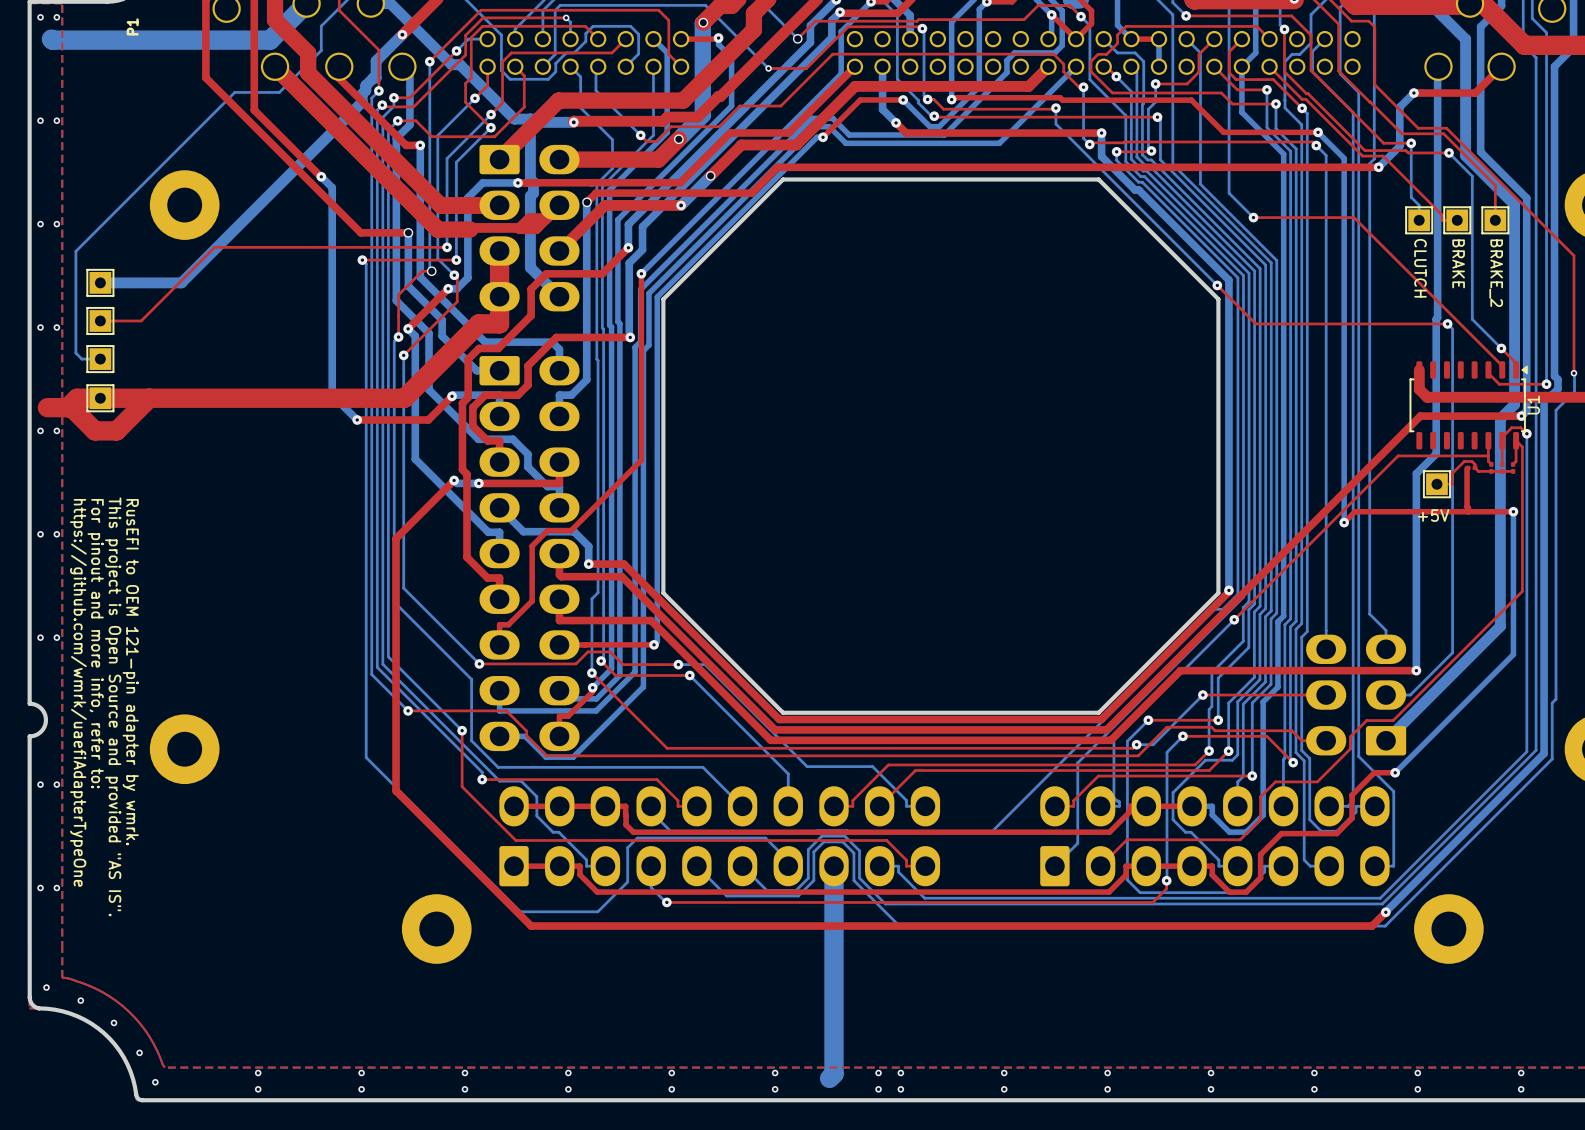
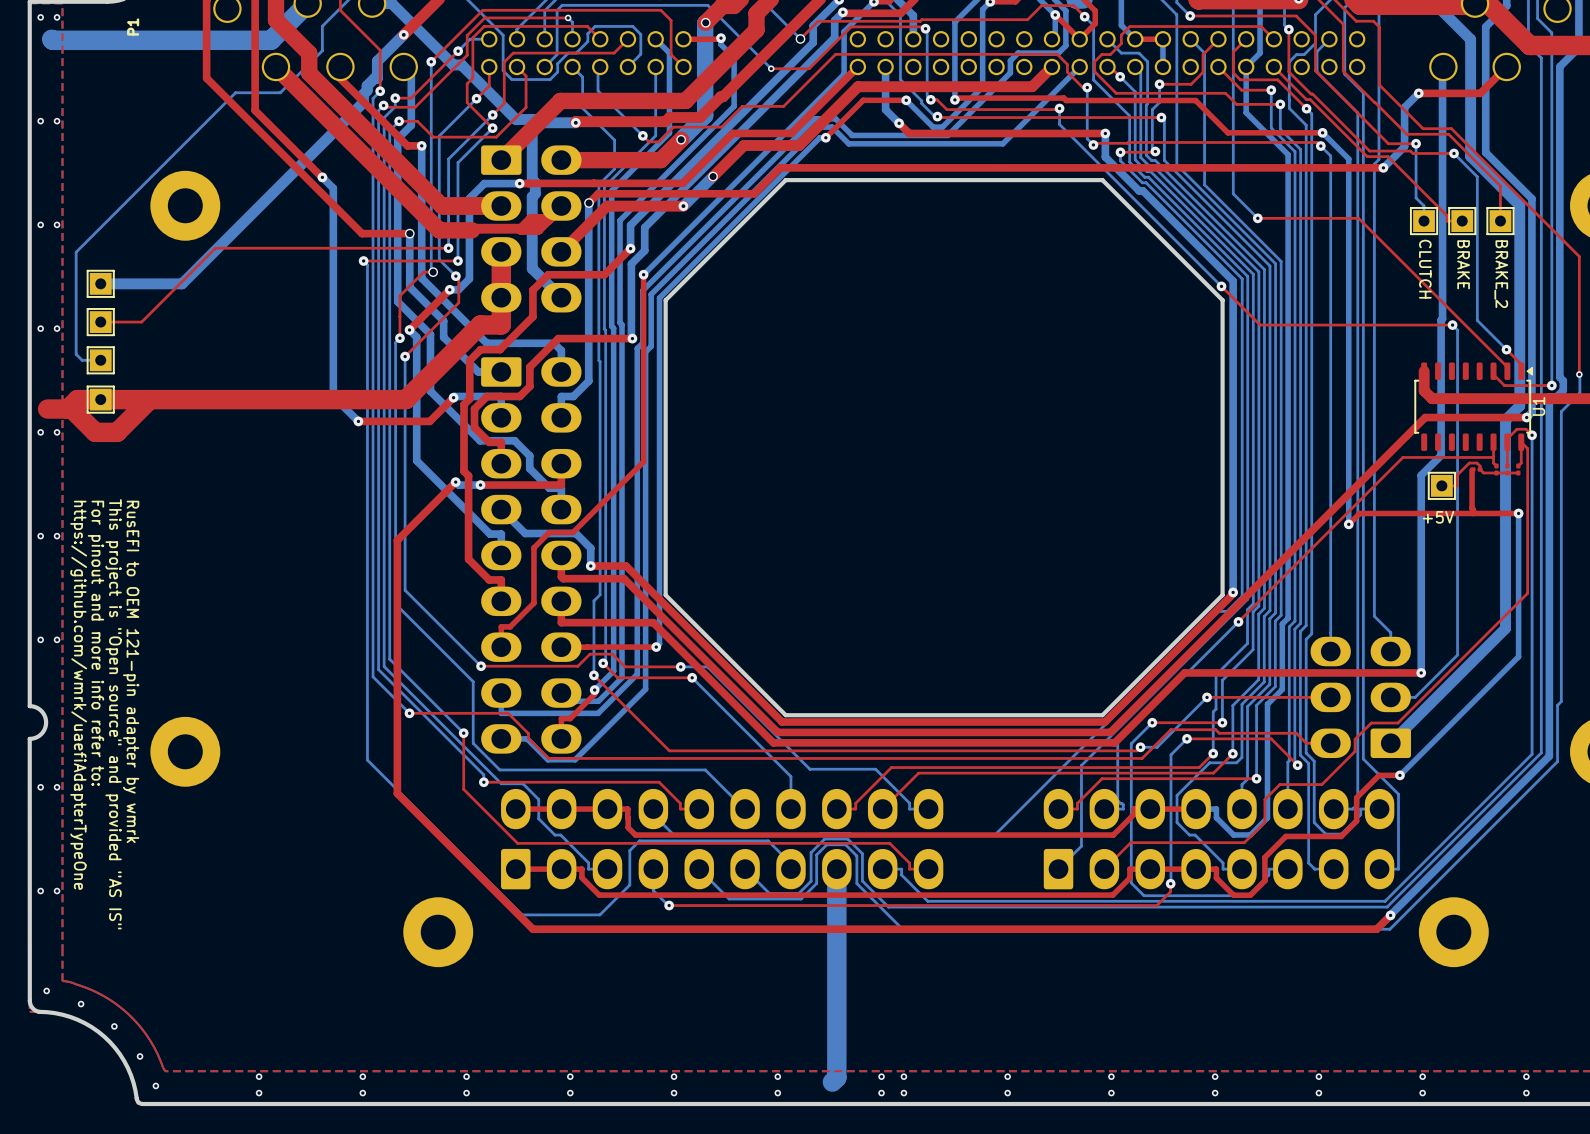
text: For pinout and more info, refer to: (95, 643) -> For pinout and more info refer to: (95, 643)
text: RusEFI to OEM 121-pin adapter by wmrk. (130, 672) -> RusEFI to OEM 121-pin adapter by wmrk (131, 671)
text: This project is Open Source and provided "AS IS". (113, 706) -> This project is "Open source" and provided "AS IS" (113, 714)

